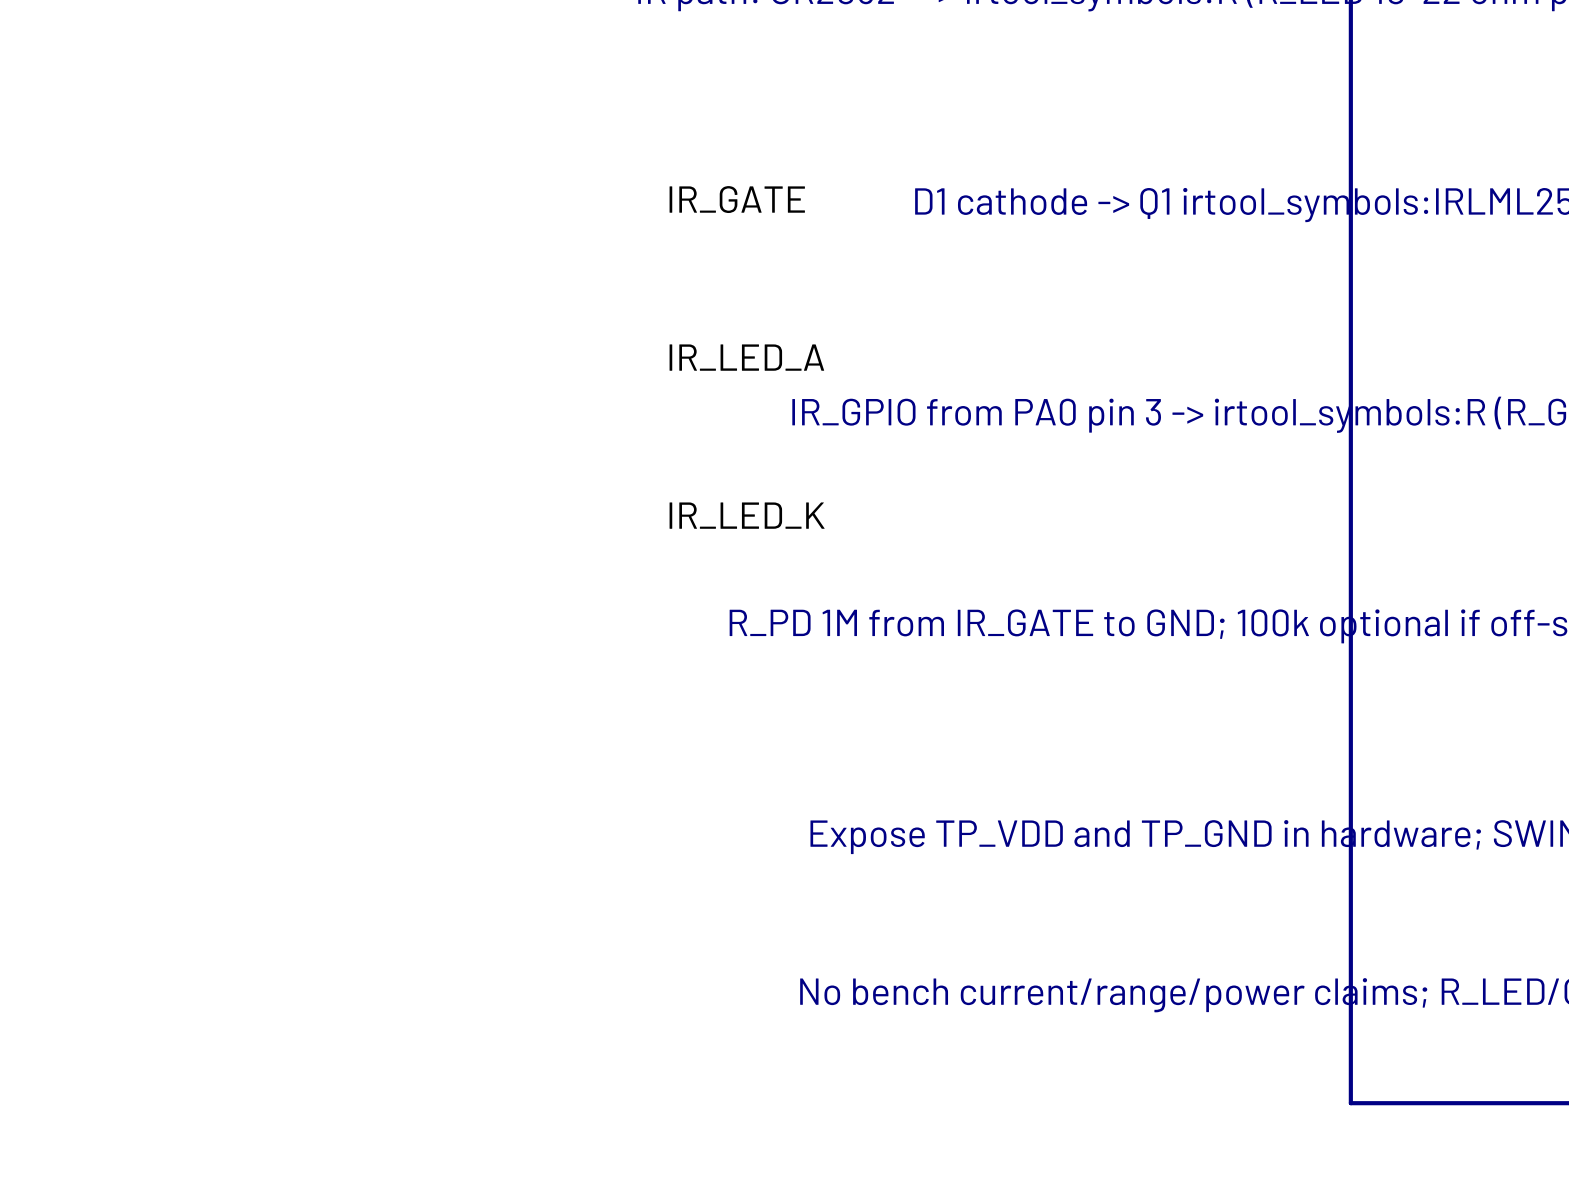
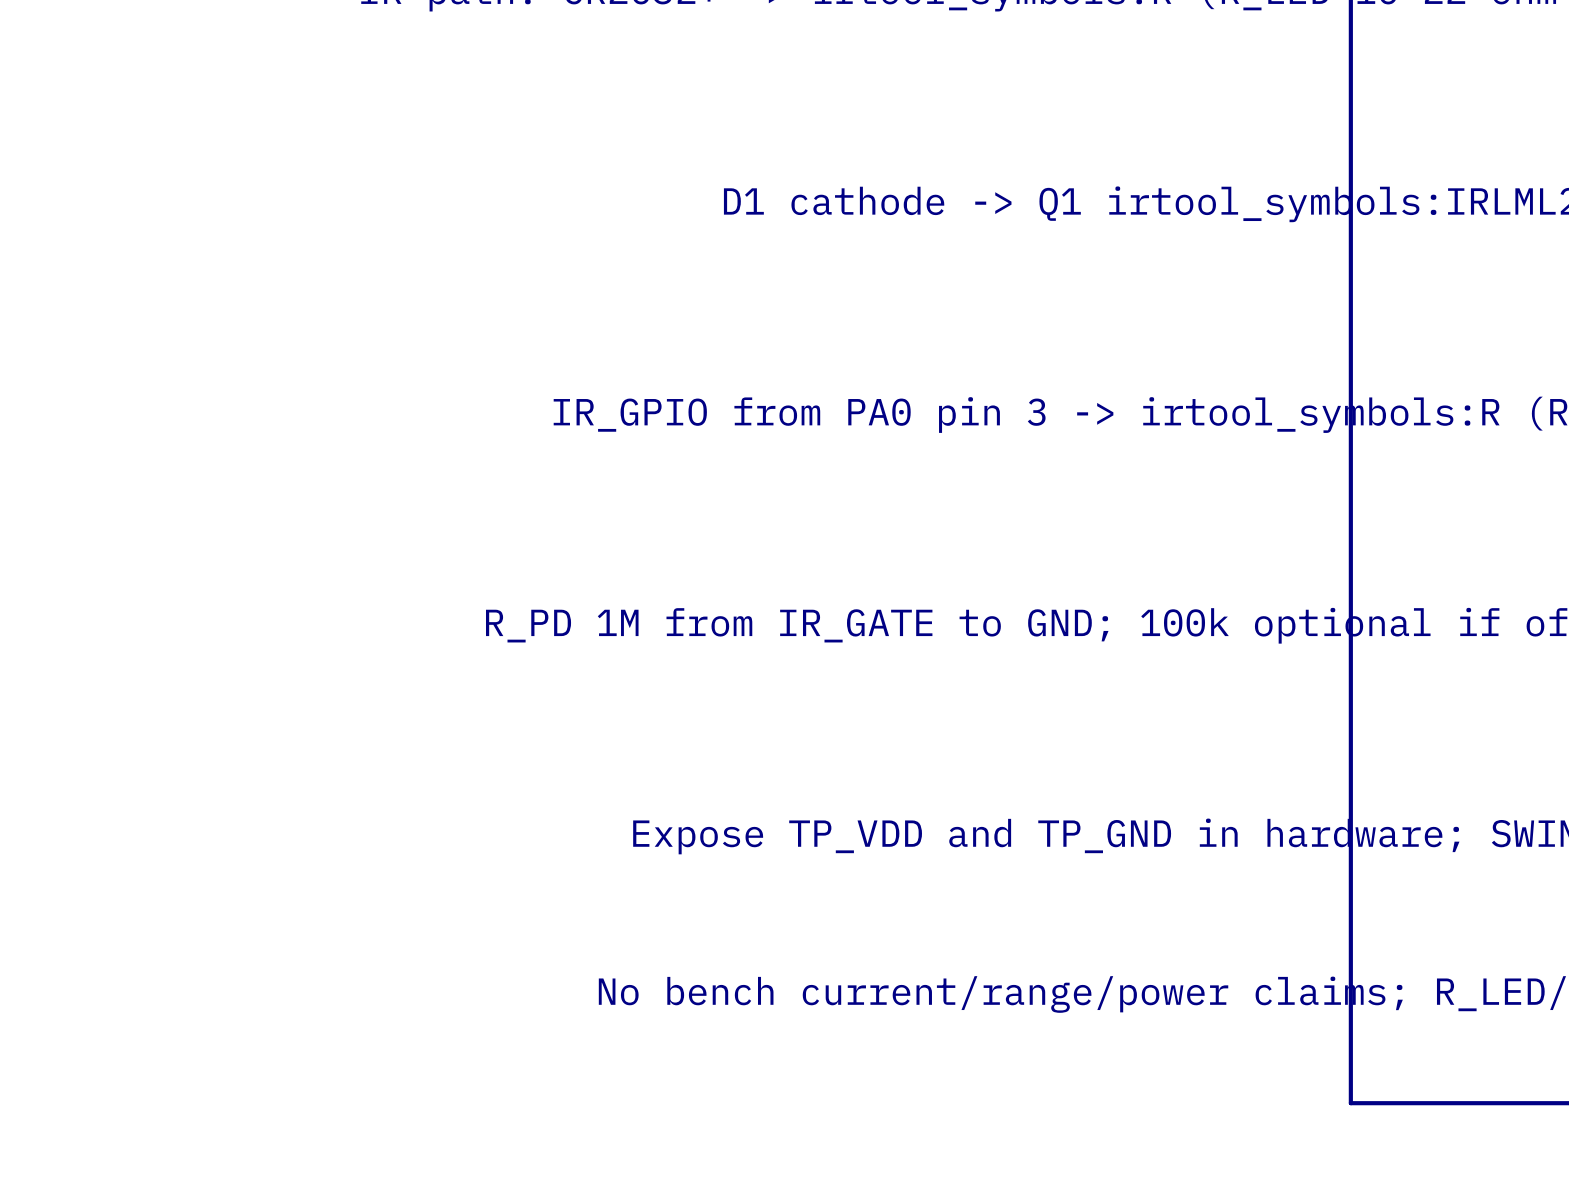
label: IR_GATE (737, 199) -> none
label: IR_LED_A (746, 357) -> none
label: IR_LED_K (747, 515) -> none

